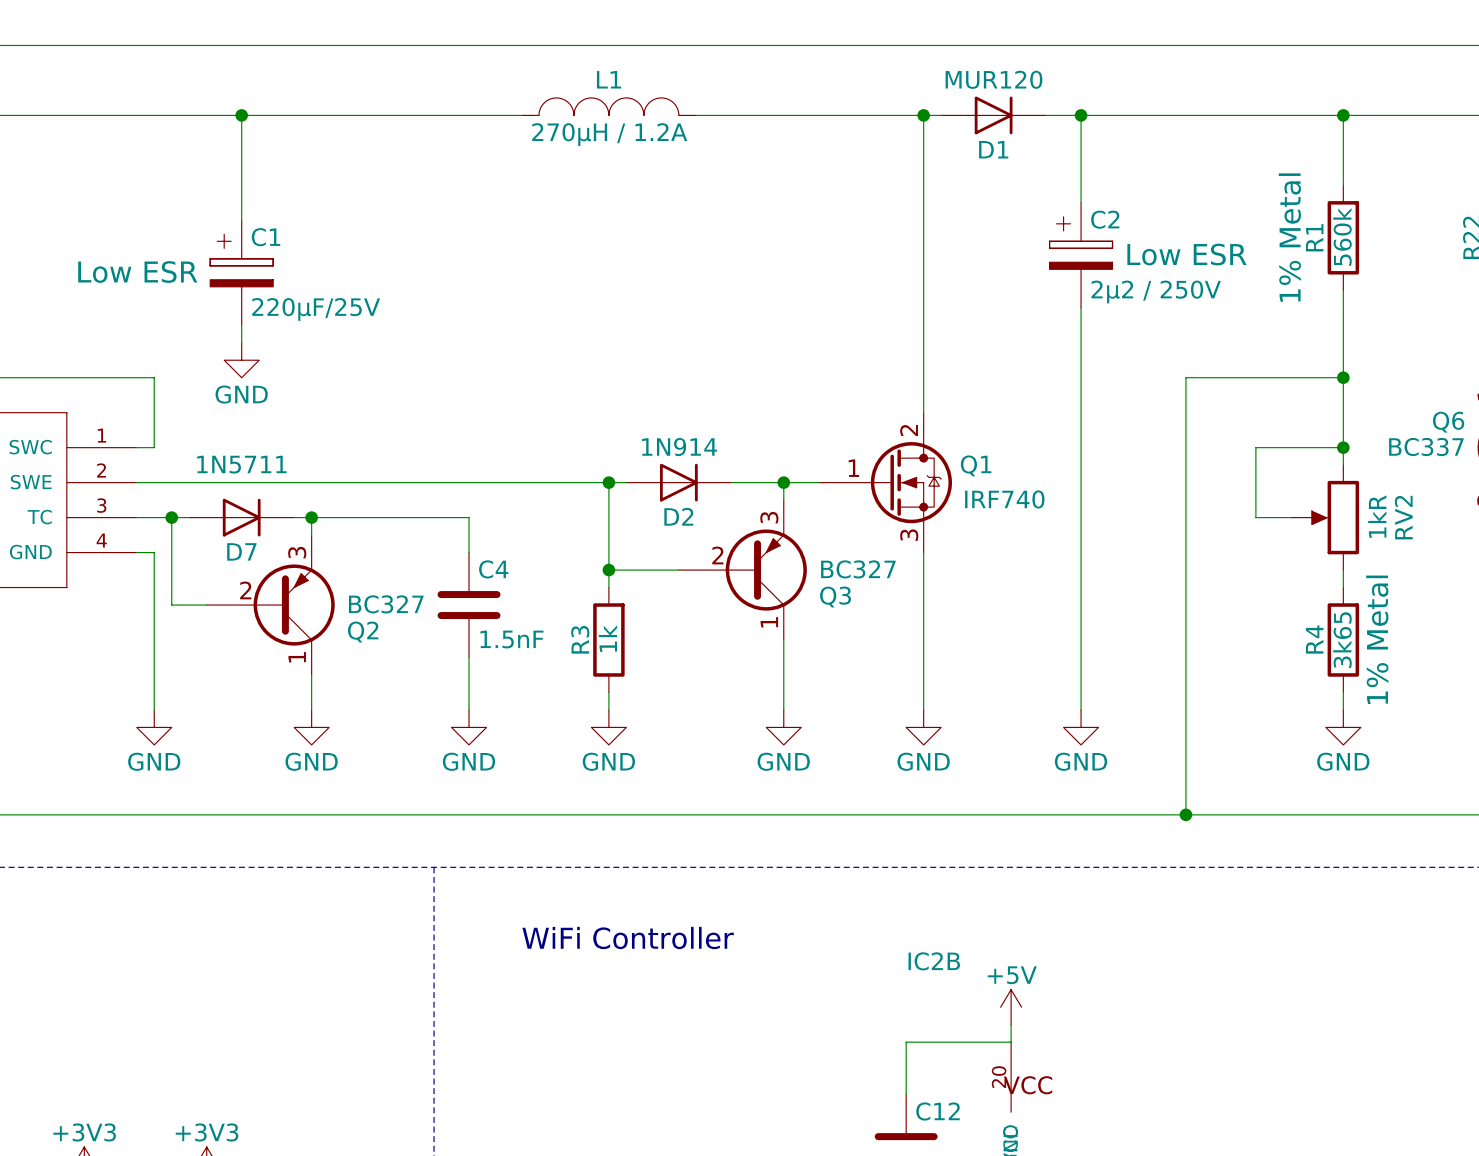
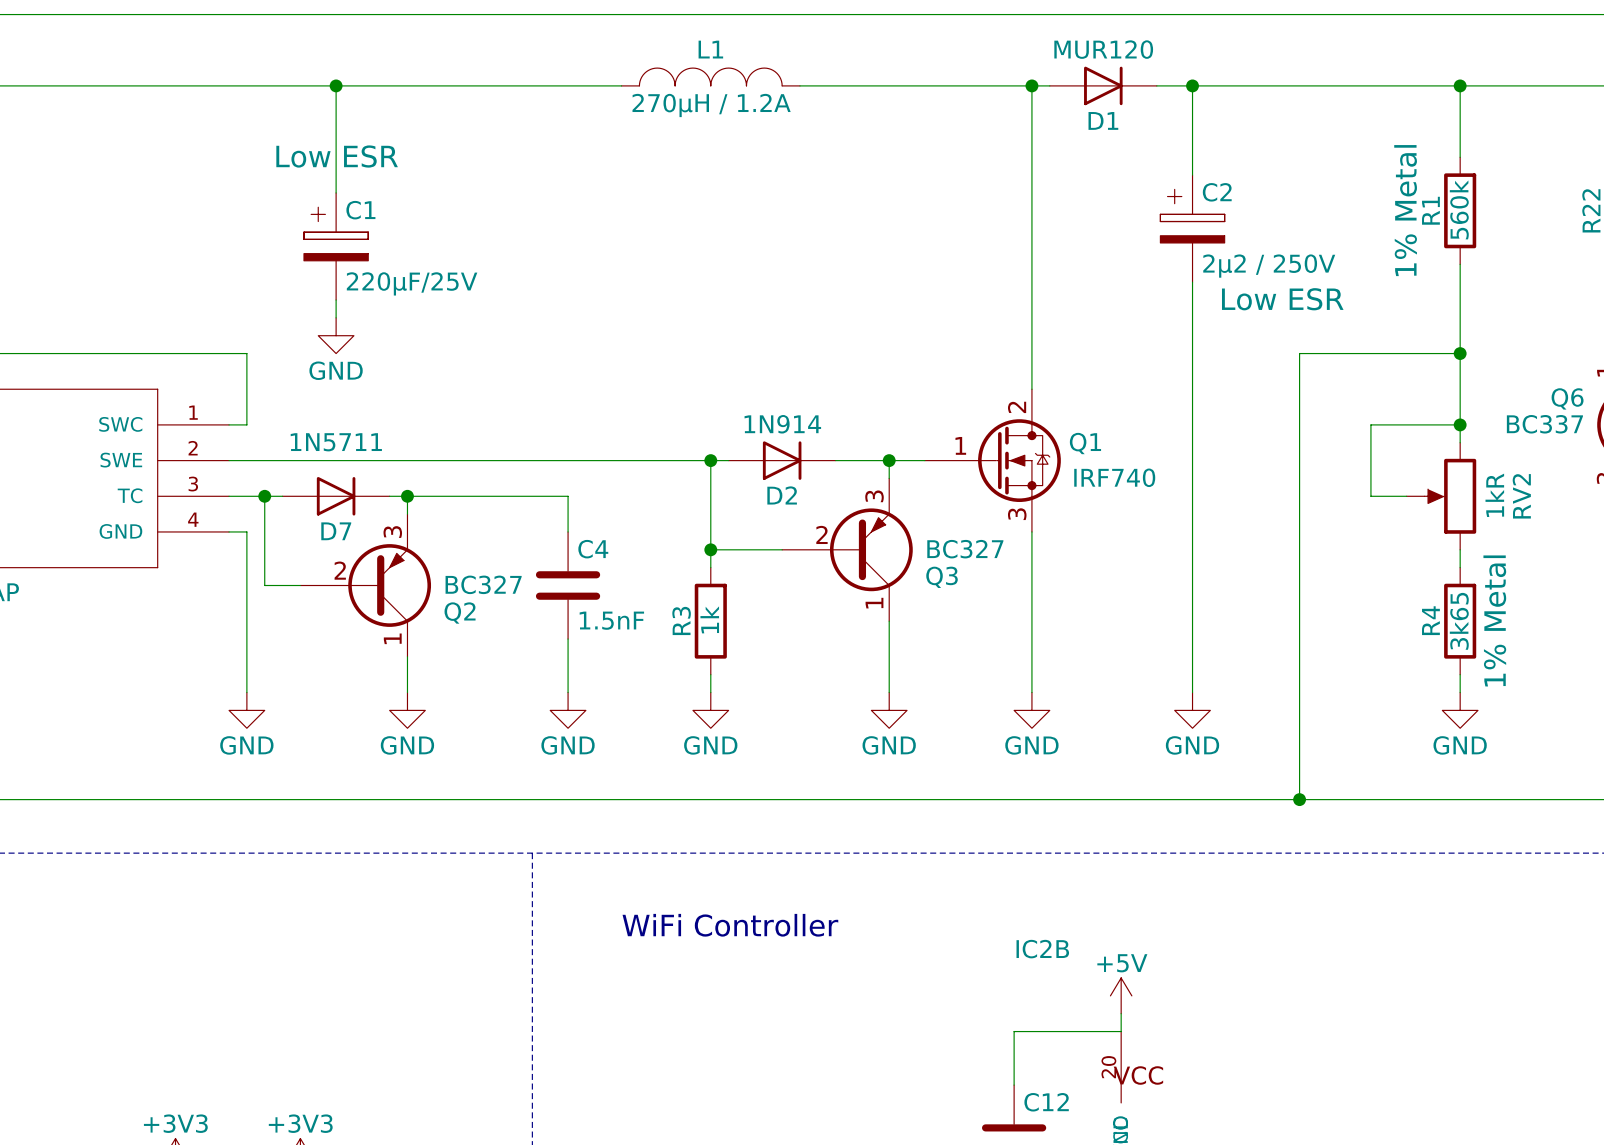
C2 text position: Low ESR (1186, 254) -> Low ESR (1282, 299)
C1 text position: Low ESR (137, 272) -> Low ESR (337, 156)

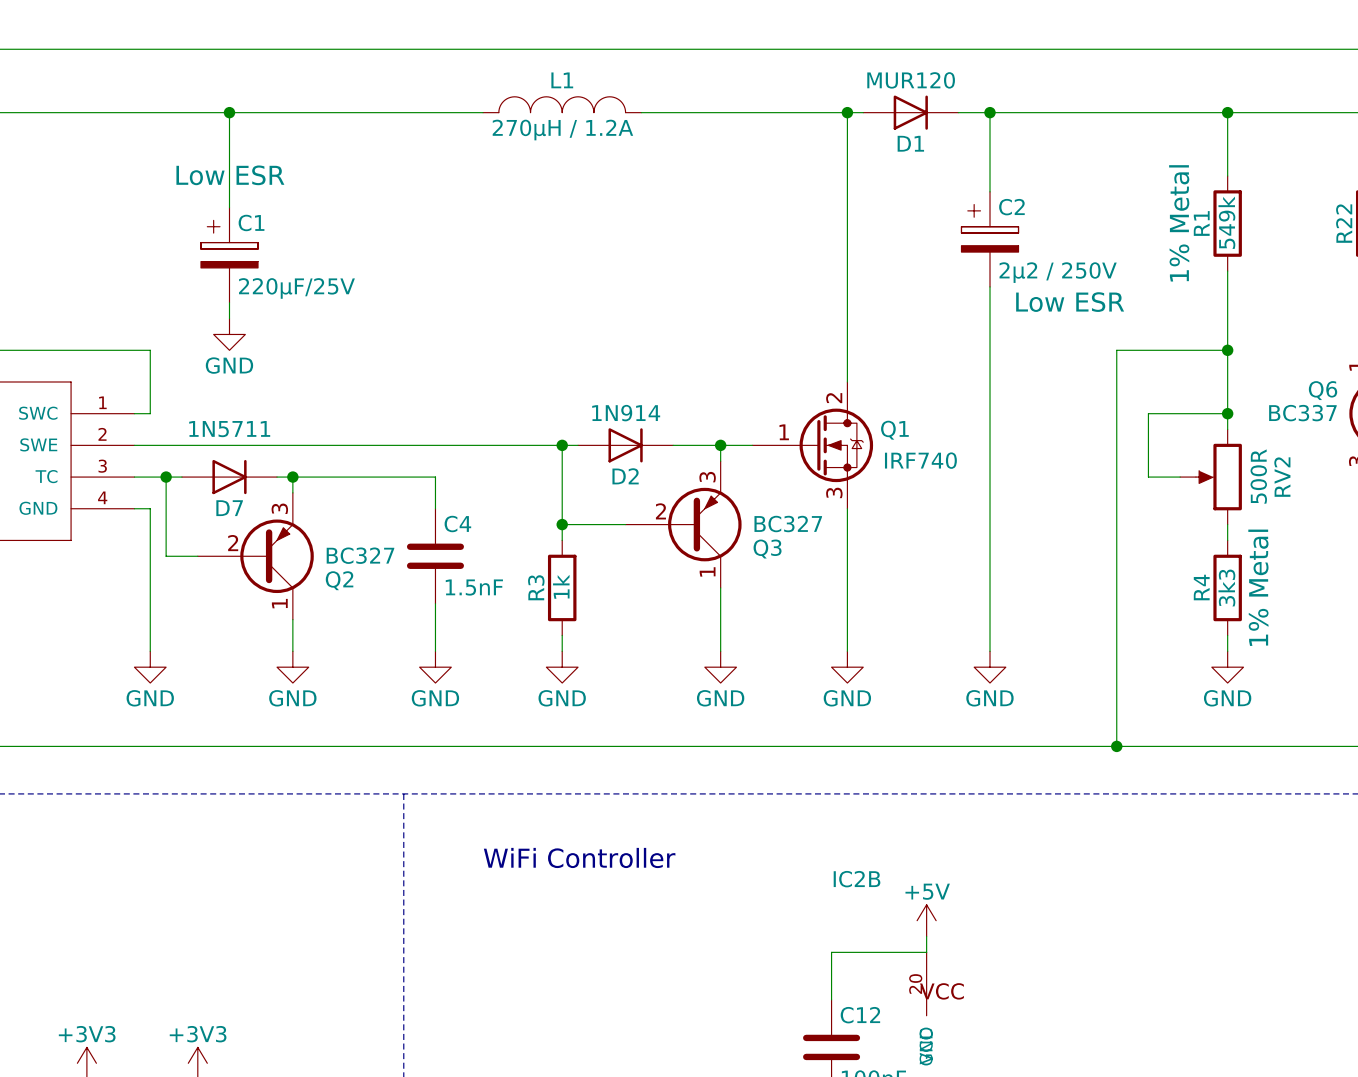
R1 value: 560k (1459, 209) -> 549k (1226, 222)
wire: (1335, 353) (1299, 353) (1299, 799) -> (1116, 350) (1116, 746)
RV2 value: 1kR (1494, 495) -> 500R (1258, 476)
R4 value: 3k65 (1459, 621) -> 3k3 (1226, 588)
junction position: (1299, 799) -> (1116, 746)

